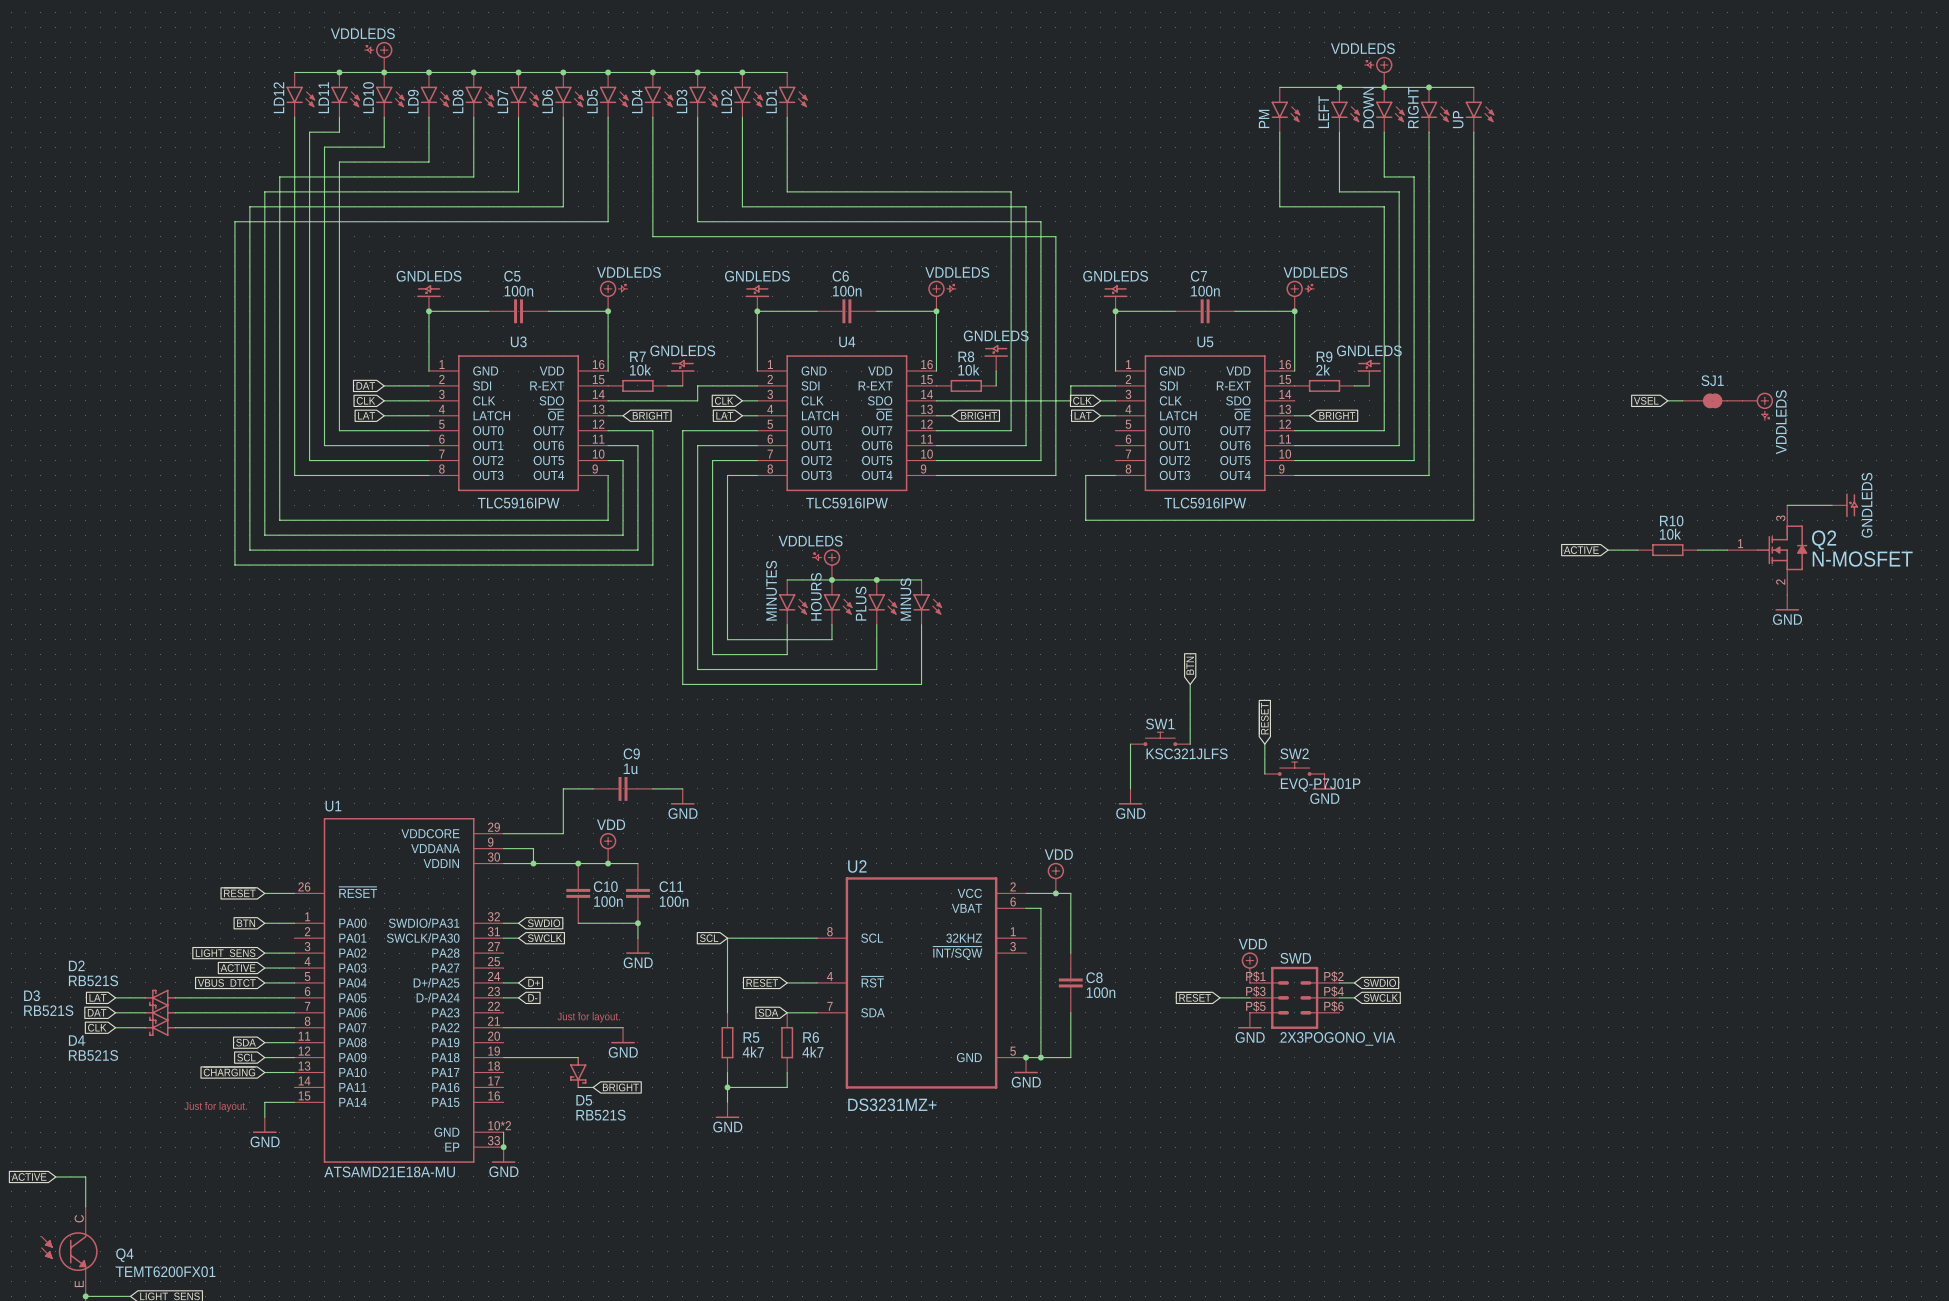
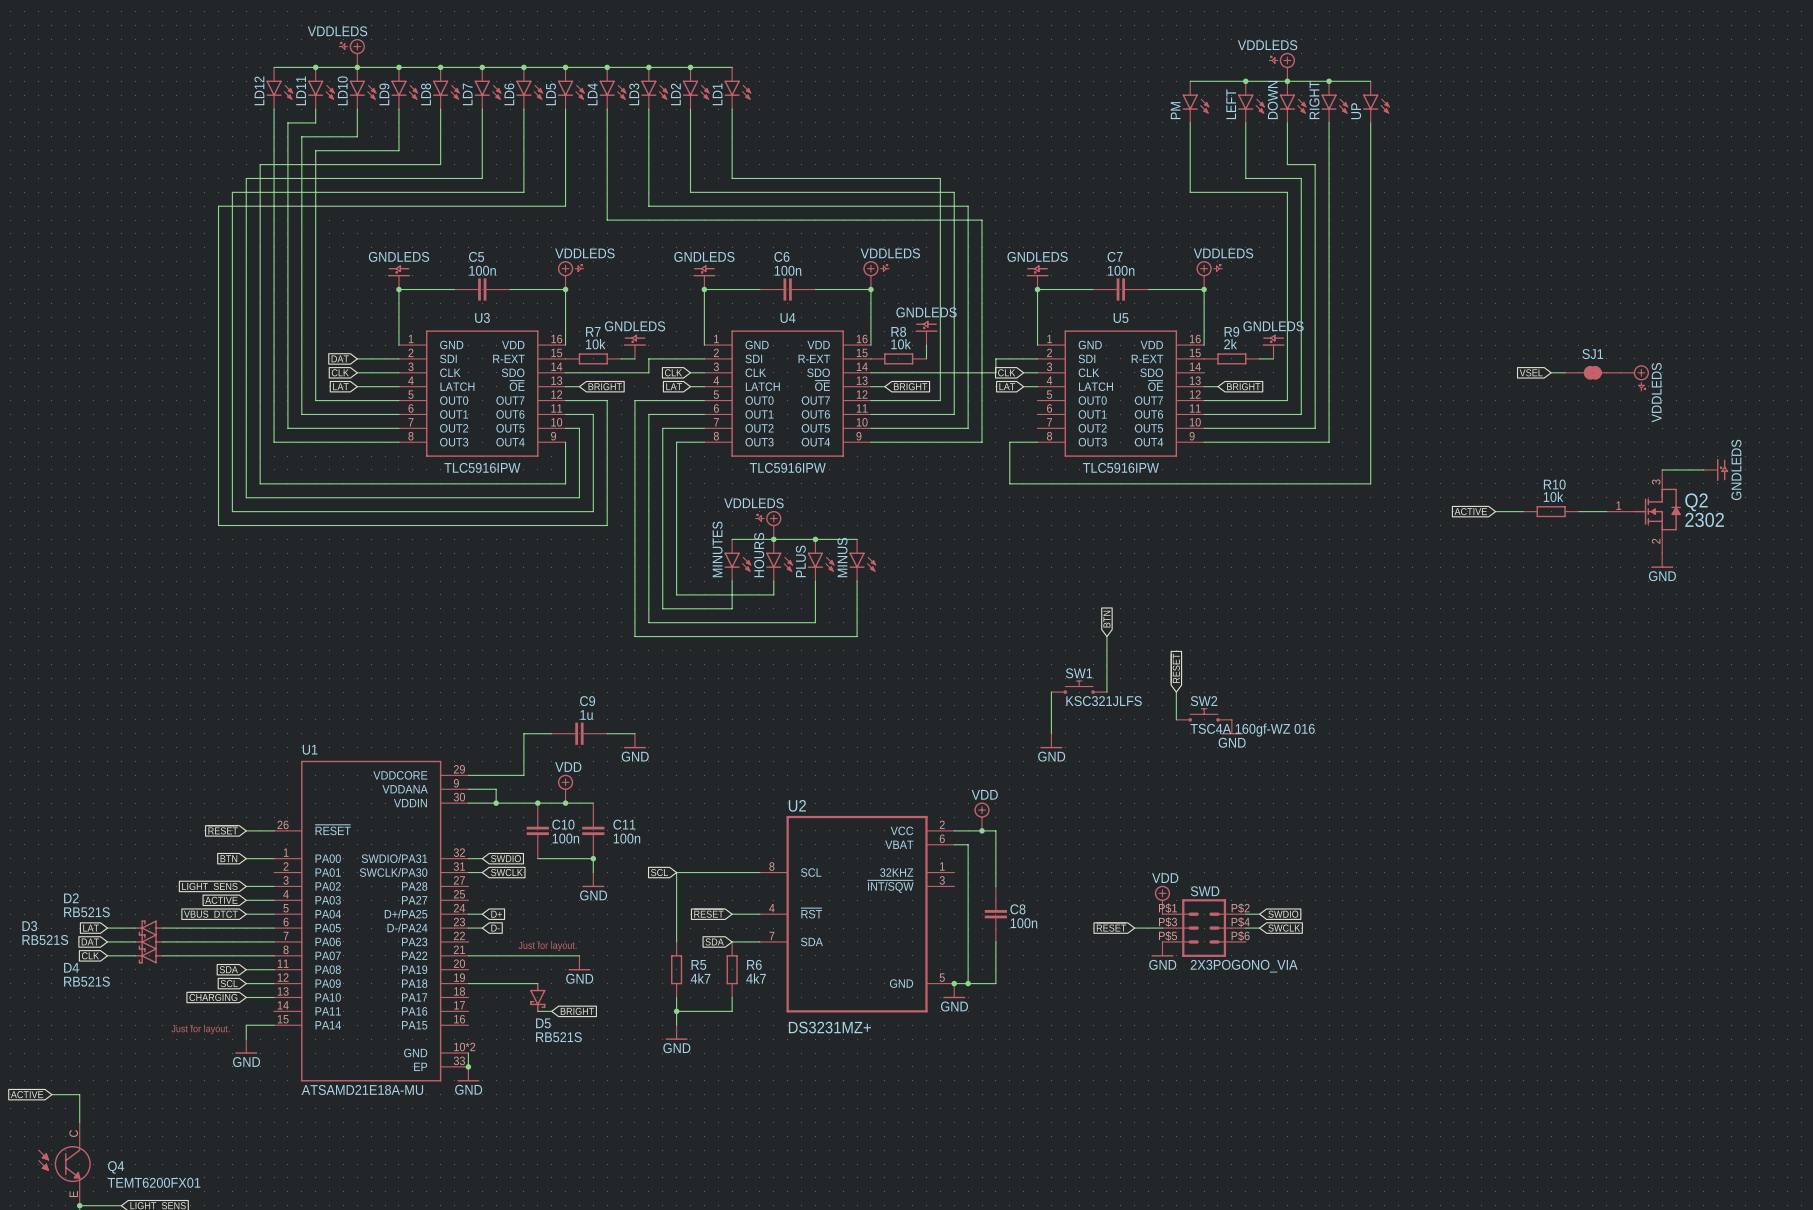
Q2 value: N-MOSFET (1862, 559) -> 2302 (1704, 519)
SW2 value: EVQ-P7J01P (1320, 785) -> TSC4A 160gf-WZ 016 (1252, 730)

